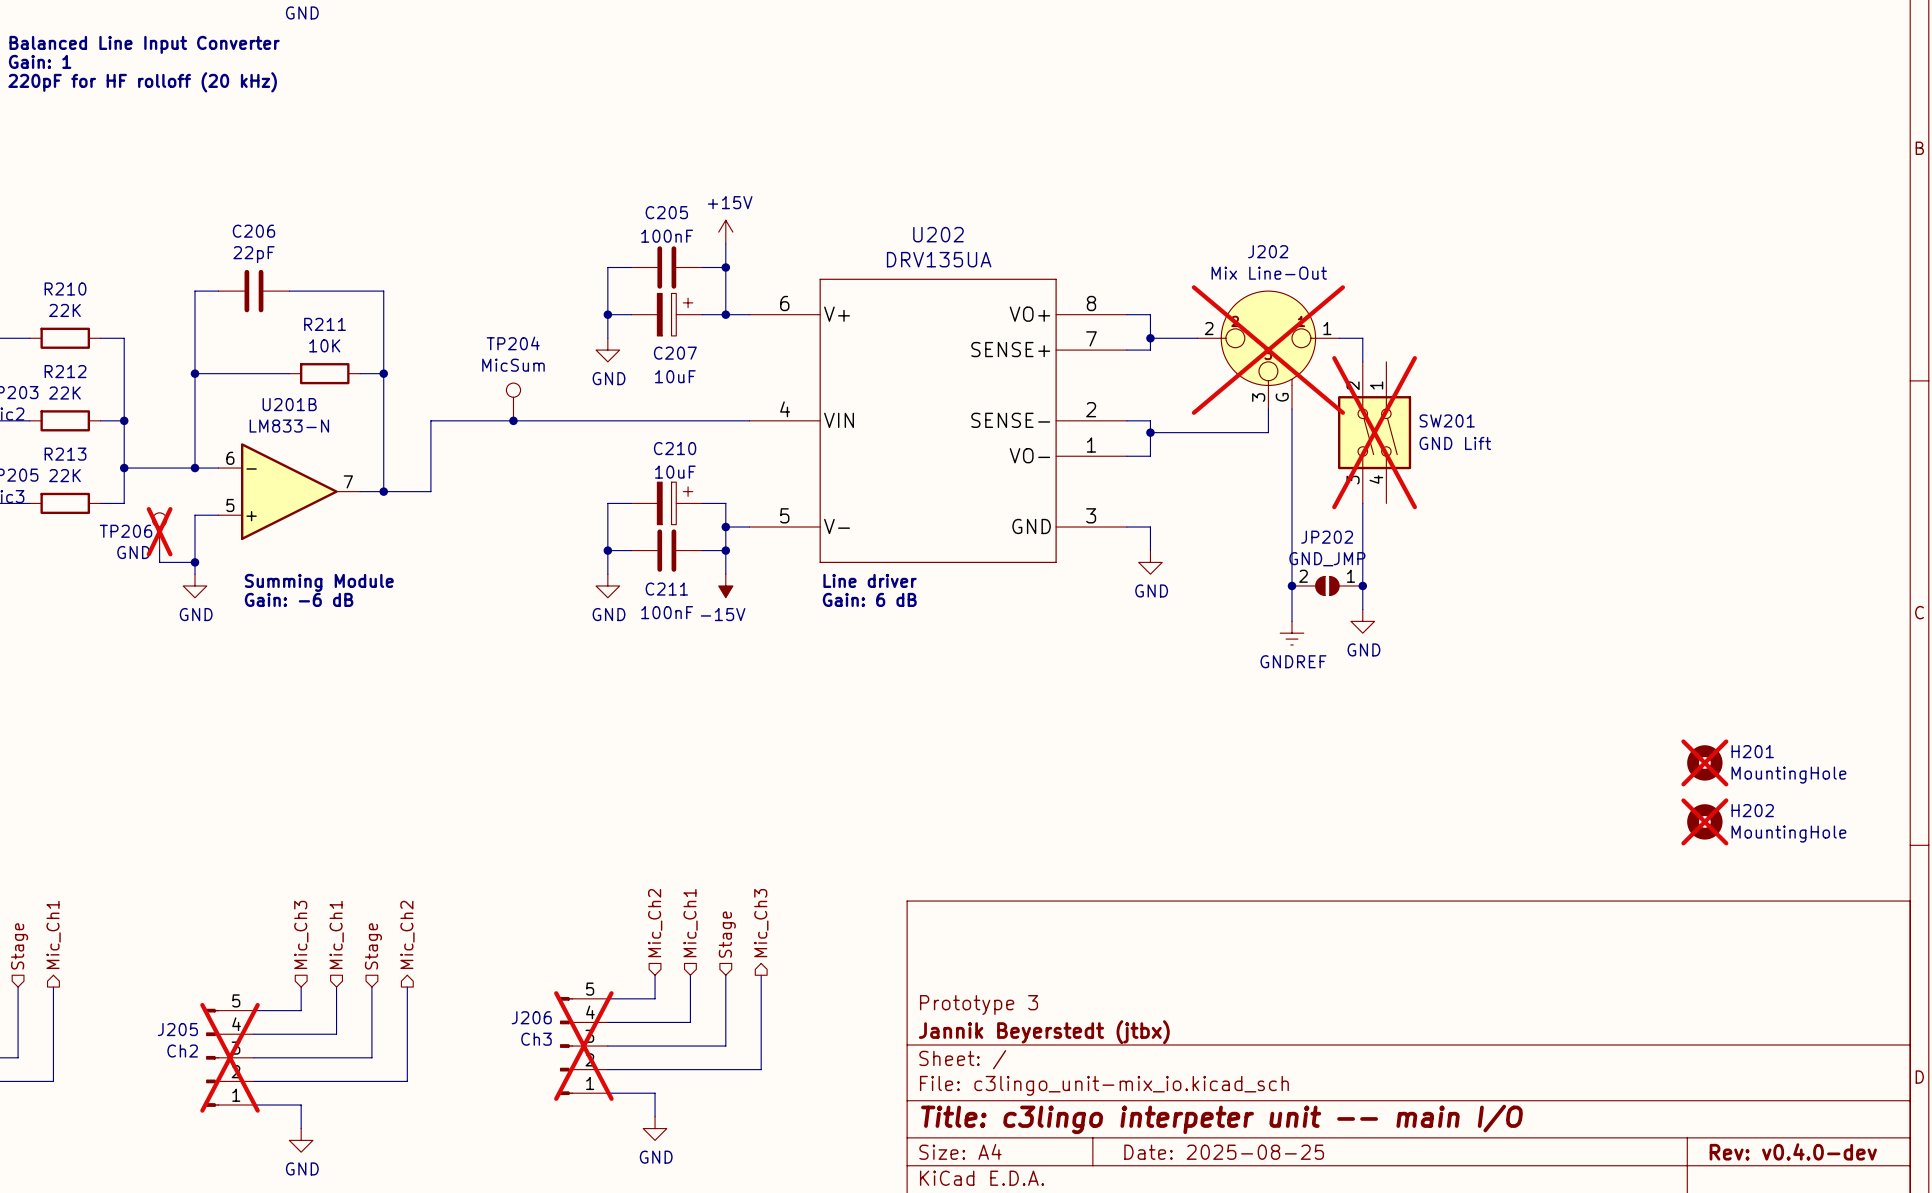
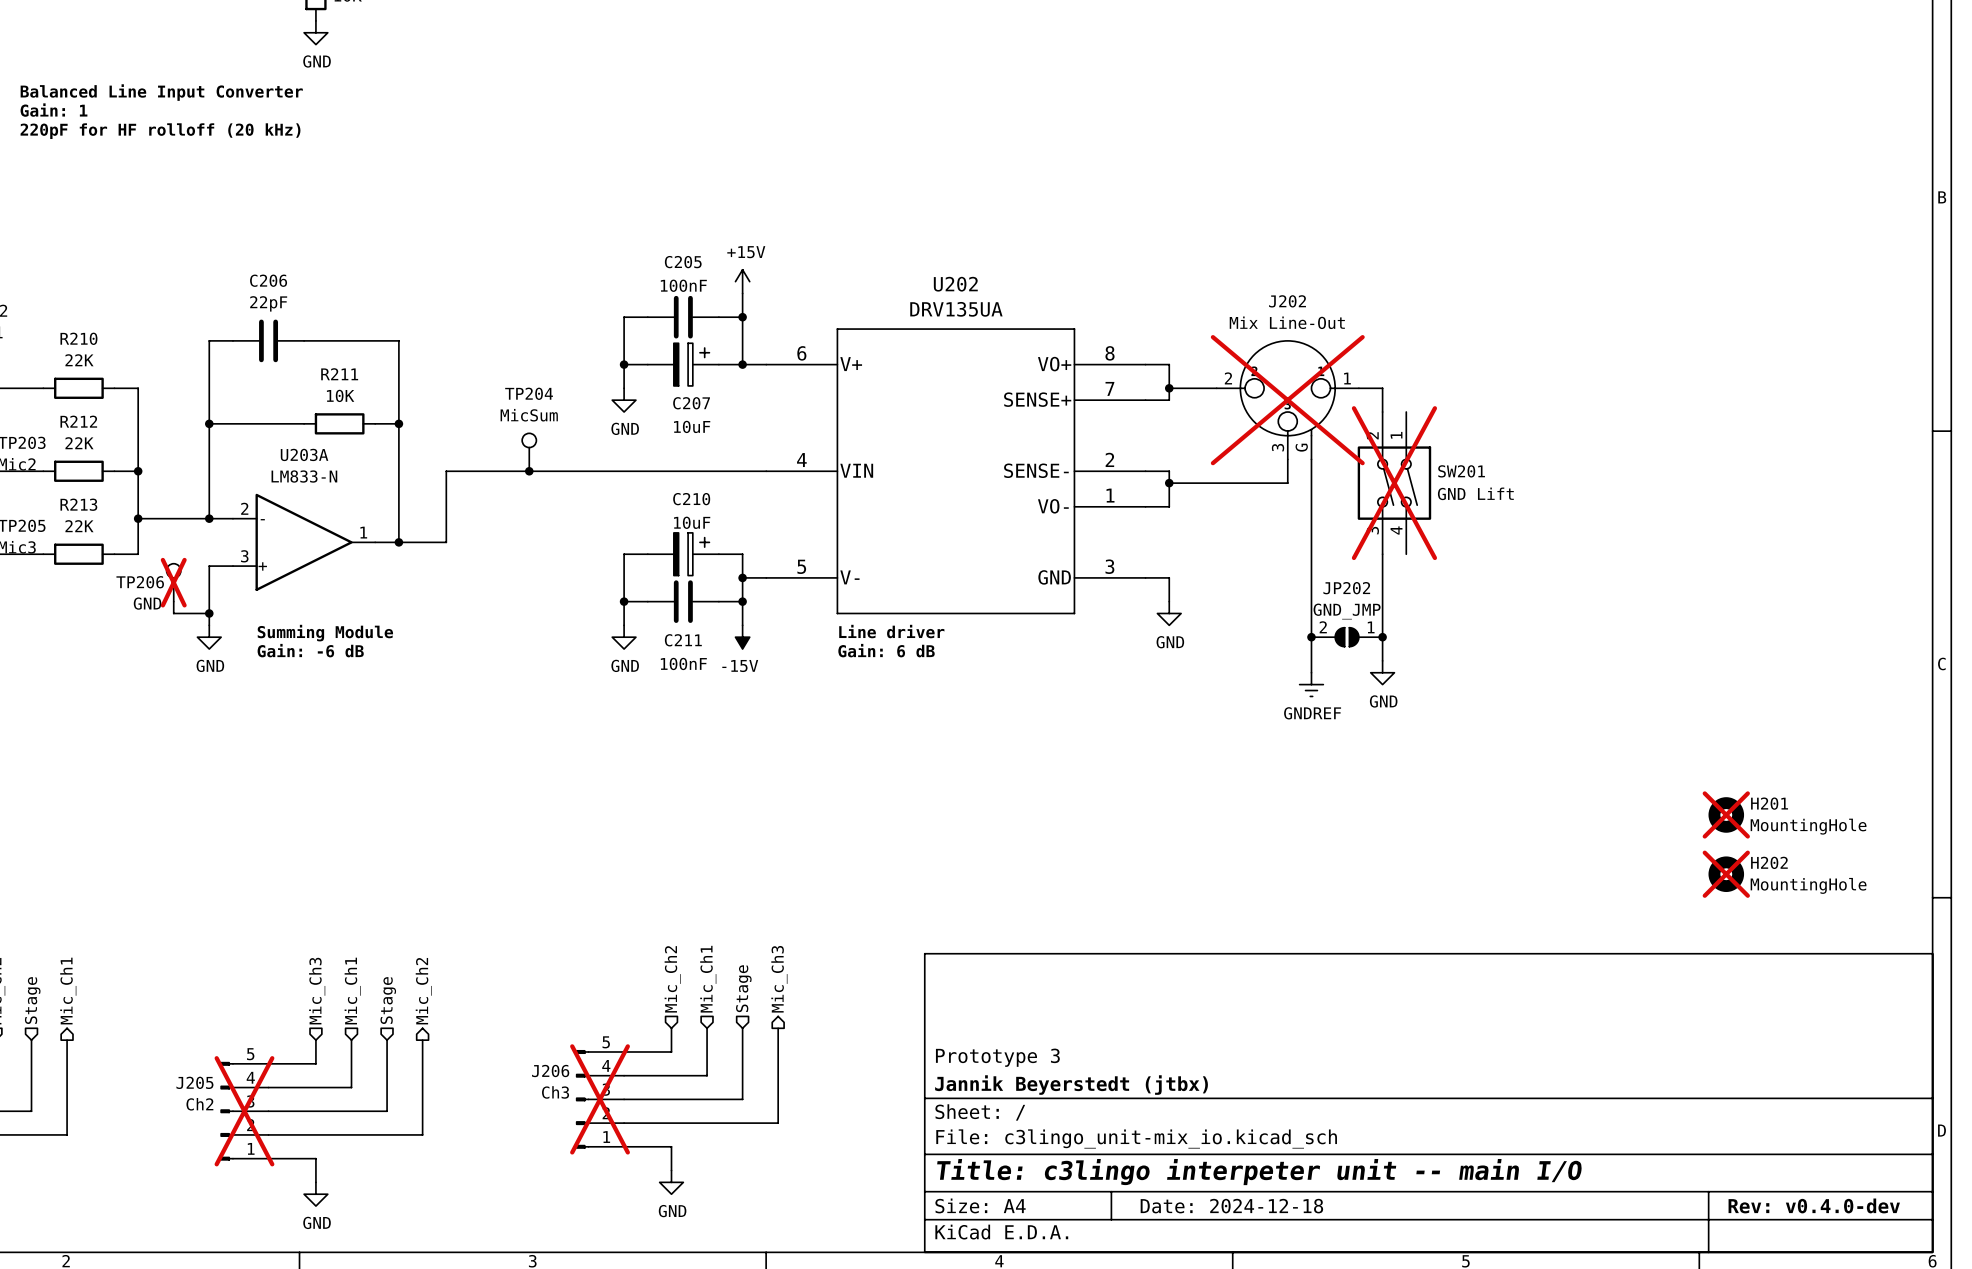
U201B name: U201B (289, 404) -> U203A (304, 454)
U201B pin number: 6 (230, 458) -> 2 (244, 508)
U201B pin number: 7 (348, 481) -> 1 (363, 532)
U201B pin number: 5 (230, 505) -> 3 (244, 556)
title block: Date: 2025-08-25 (1224, 1152) -> Date: 2024-12-18 (1231, 1206)

